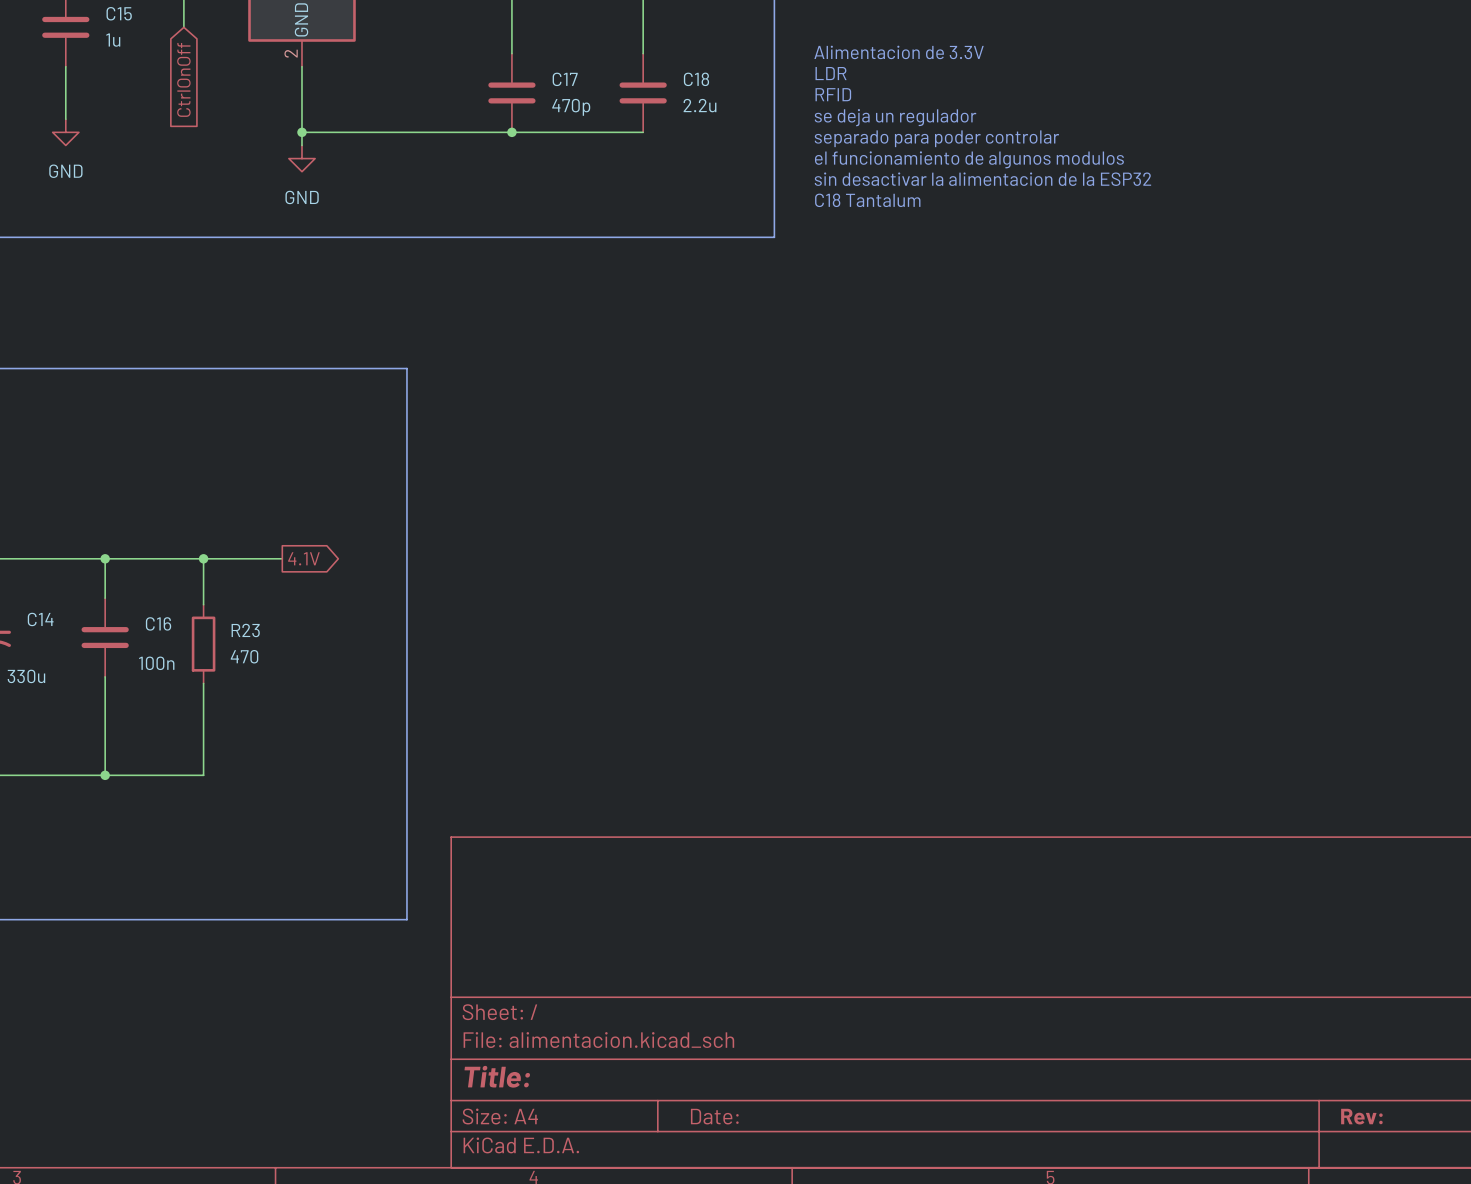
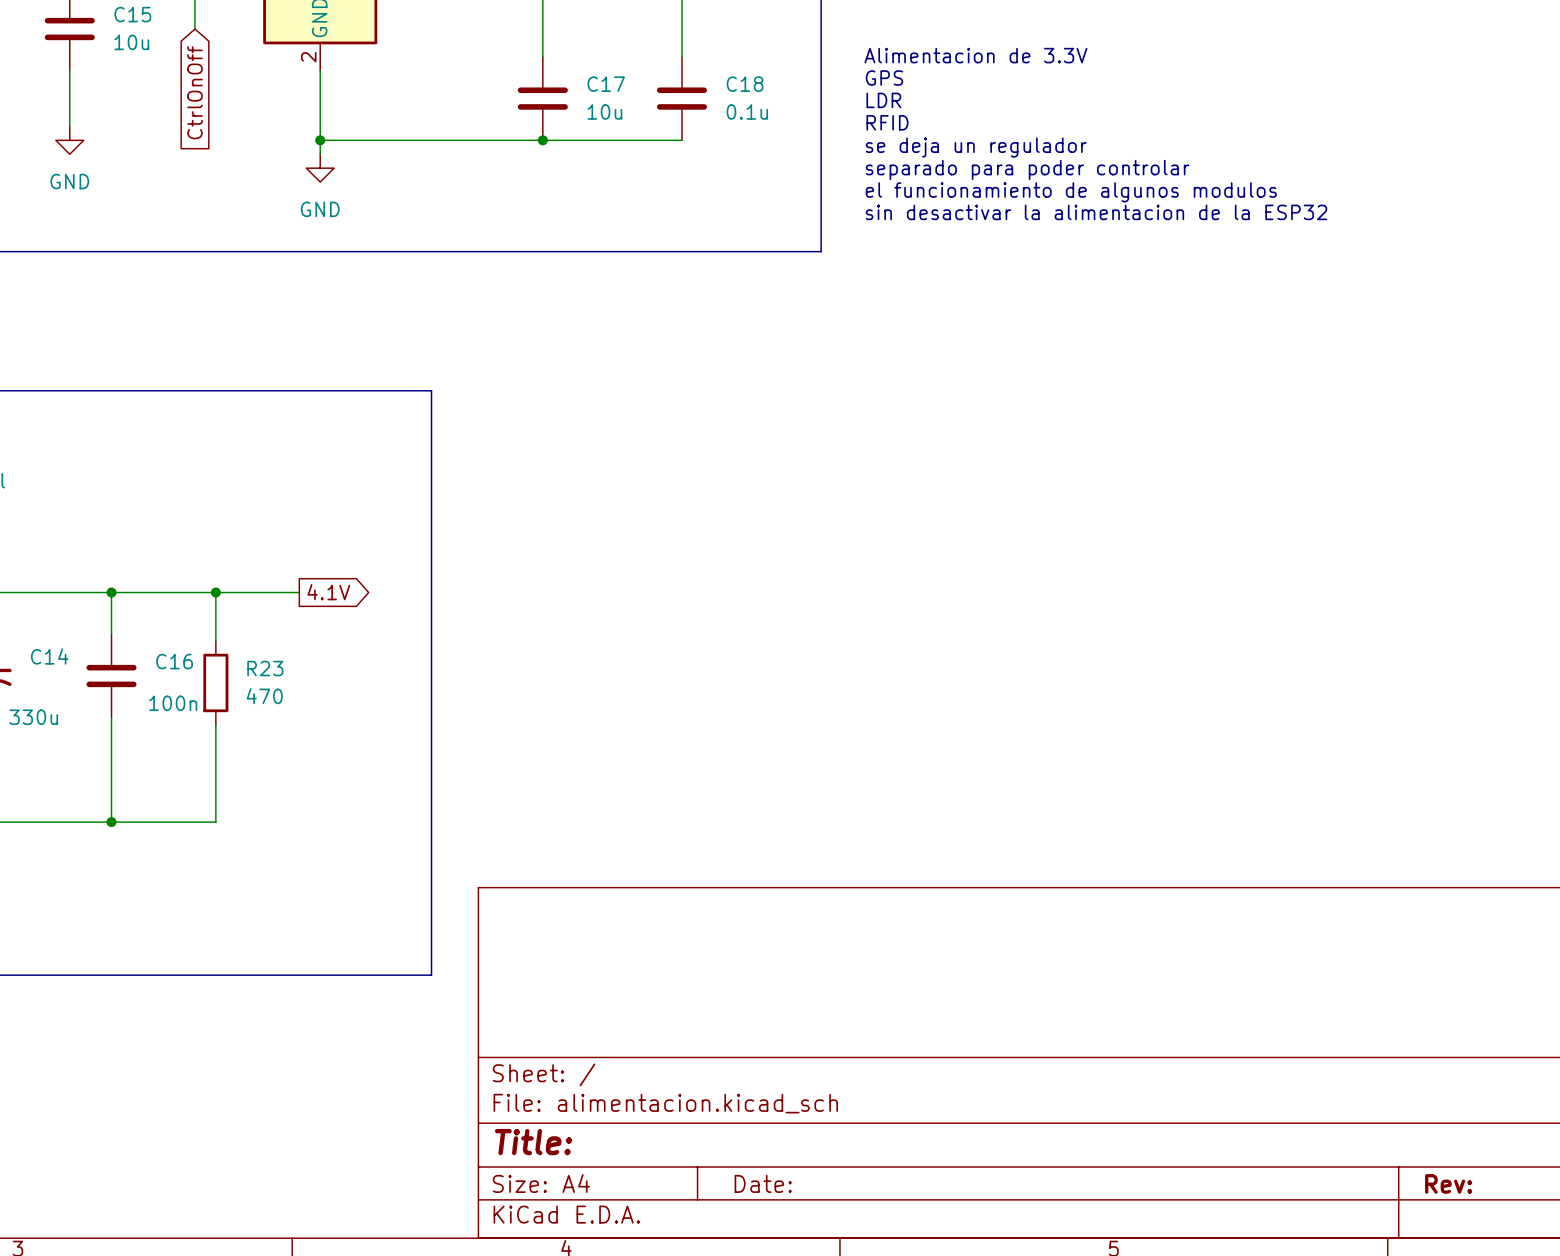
C15 value: 1u (113, 40) -> 10u (131, 42)
text: LDR (831, 73) -> GPS (884, 78)
text: RFID (833, 94) -> LDR (883, 100)
C18 value: 2.2u (700, 105) -> 0.1u (747, 111)
C17 value: 470p (571, 107) -> 10u (604, 111)
text: se deja un regulador (895, 117) -> RFID (887, 122)
text: separado para poder controlar (936, 138) -> se deja un regulador (976, 147)
text: el funcionamiento de algunos modulos (969, 159) -> separado para poder controlar (1027, 169)
text: sin desactivar la alimentacion de la ESP32 (982, 179) -> el funcionamiento de algunos modulos (1071, 192)
text: C18 Tantalum (867, 200) -> sin desactivar la alimentacion de la ESP32 (1096, 212)

